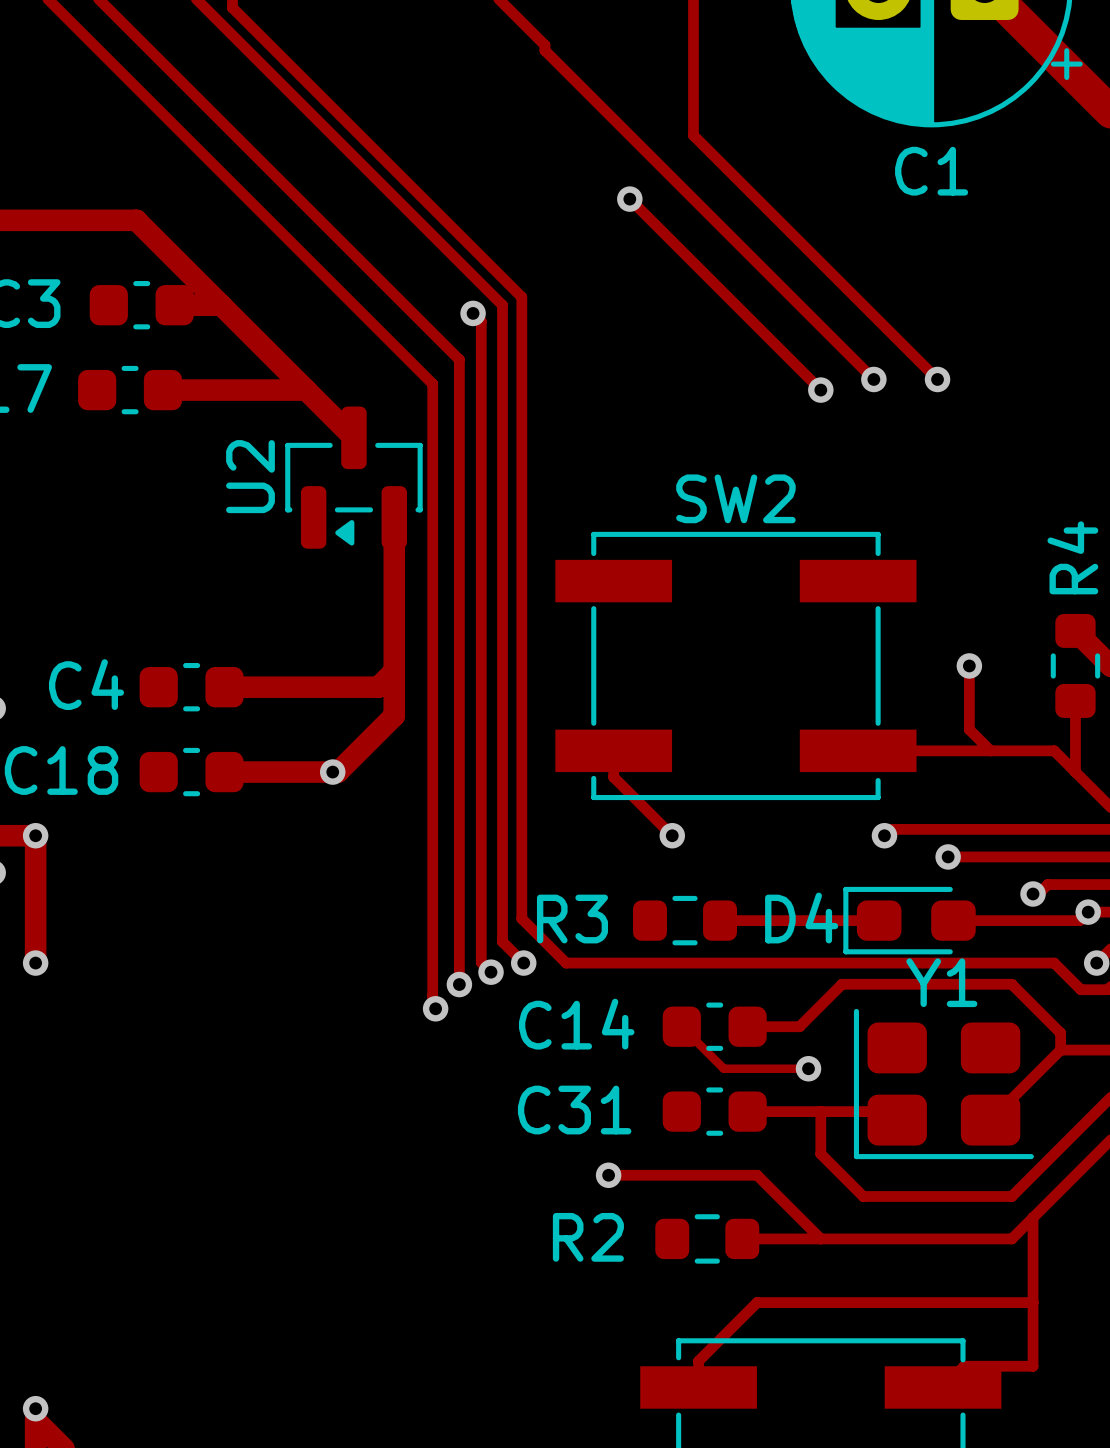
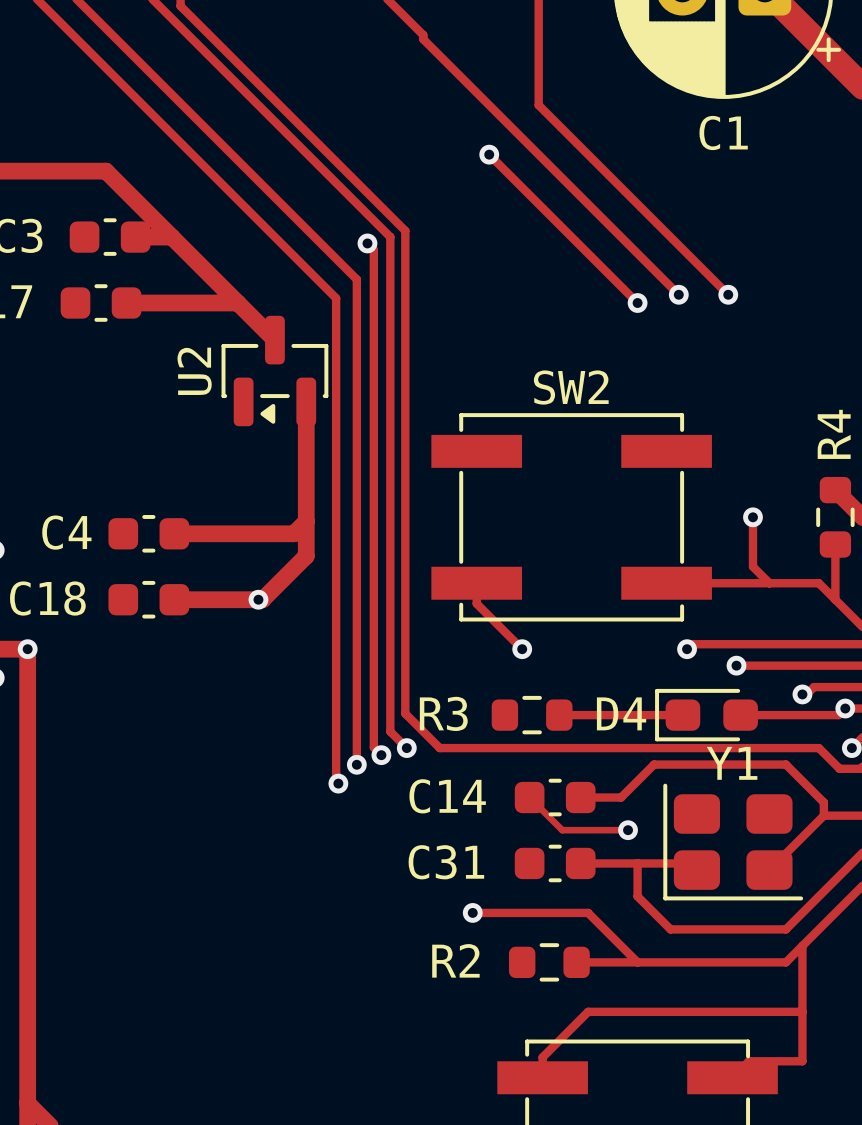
track: none -> (27, 748) (27, 1103)
via: (35, 963) -> none
via: (35, 1408) -> none

